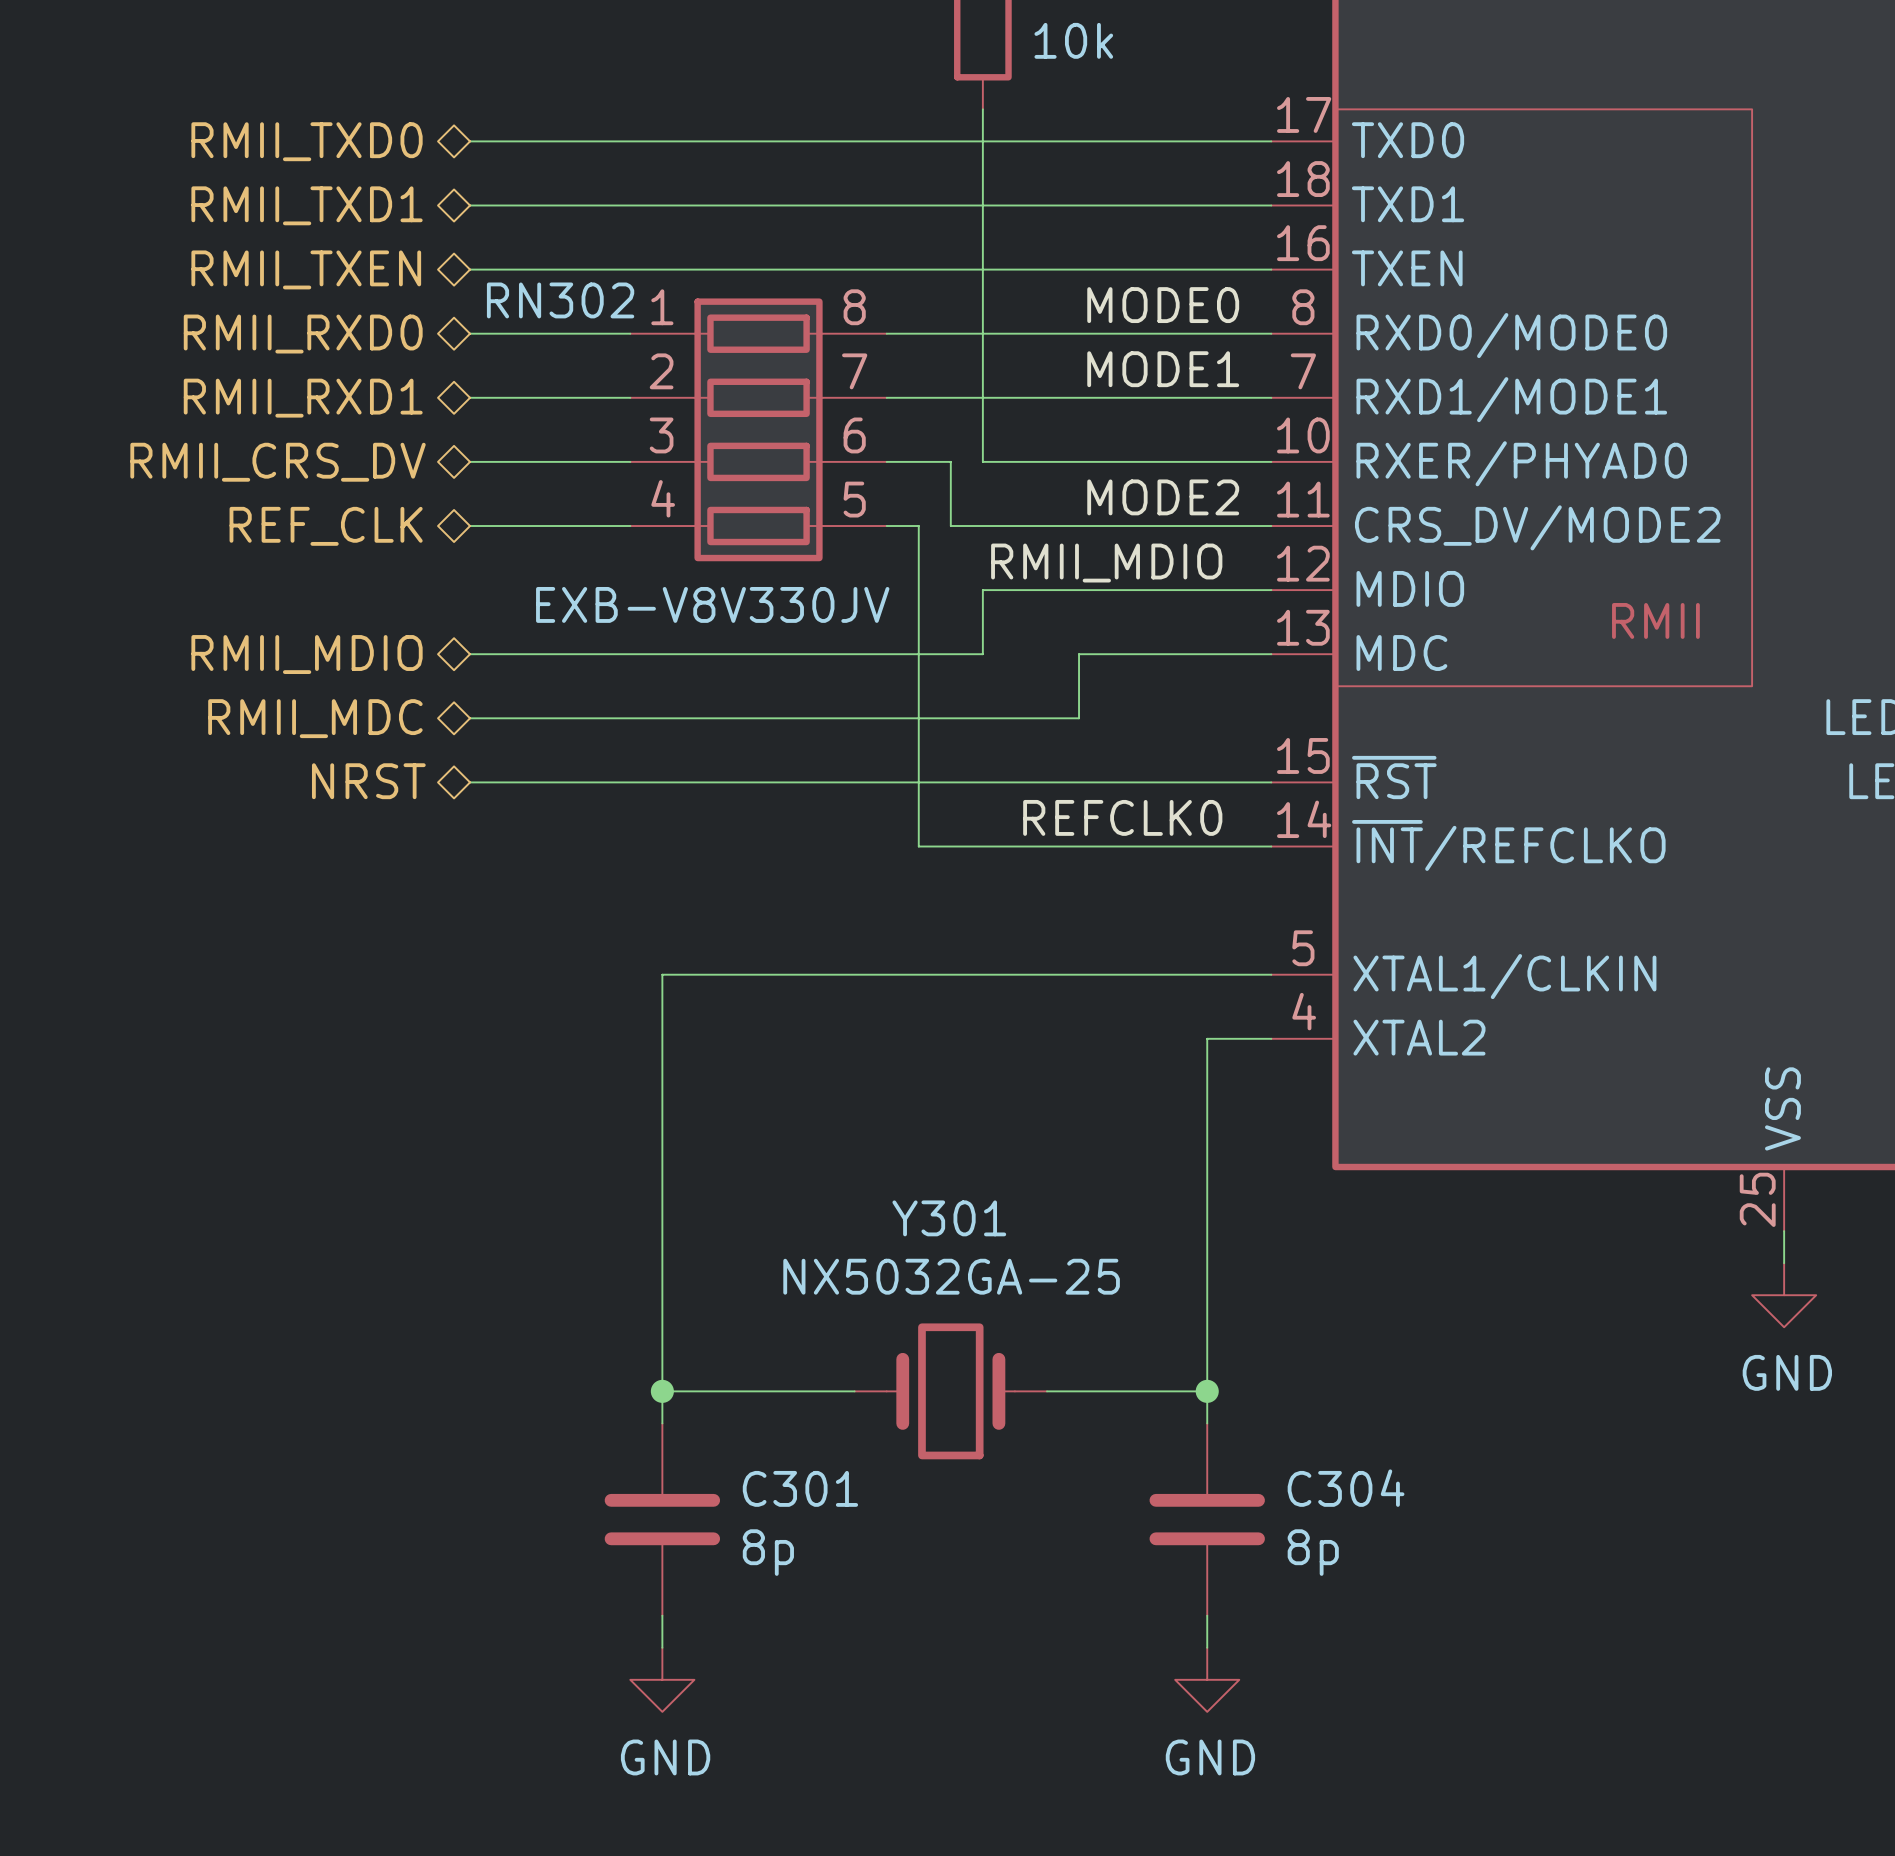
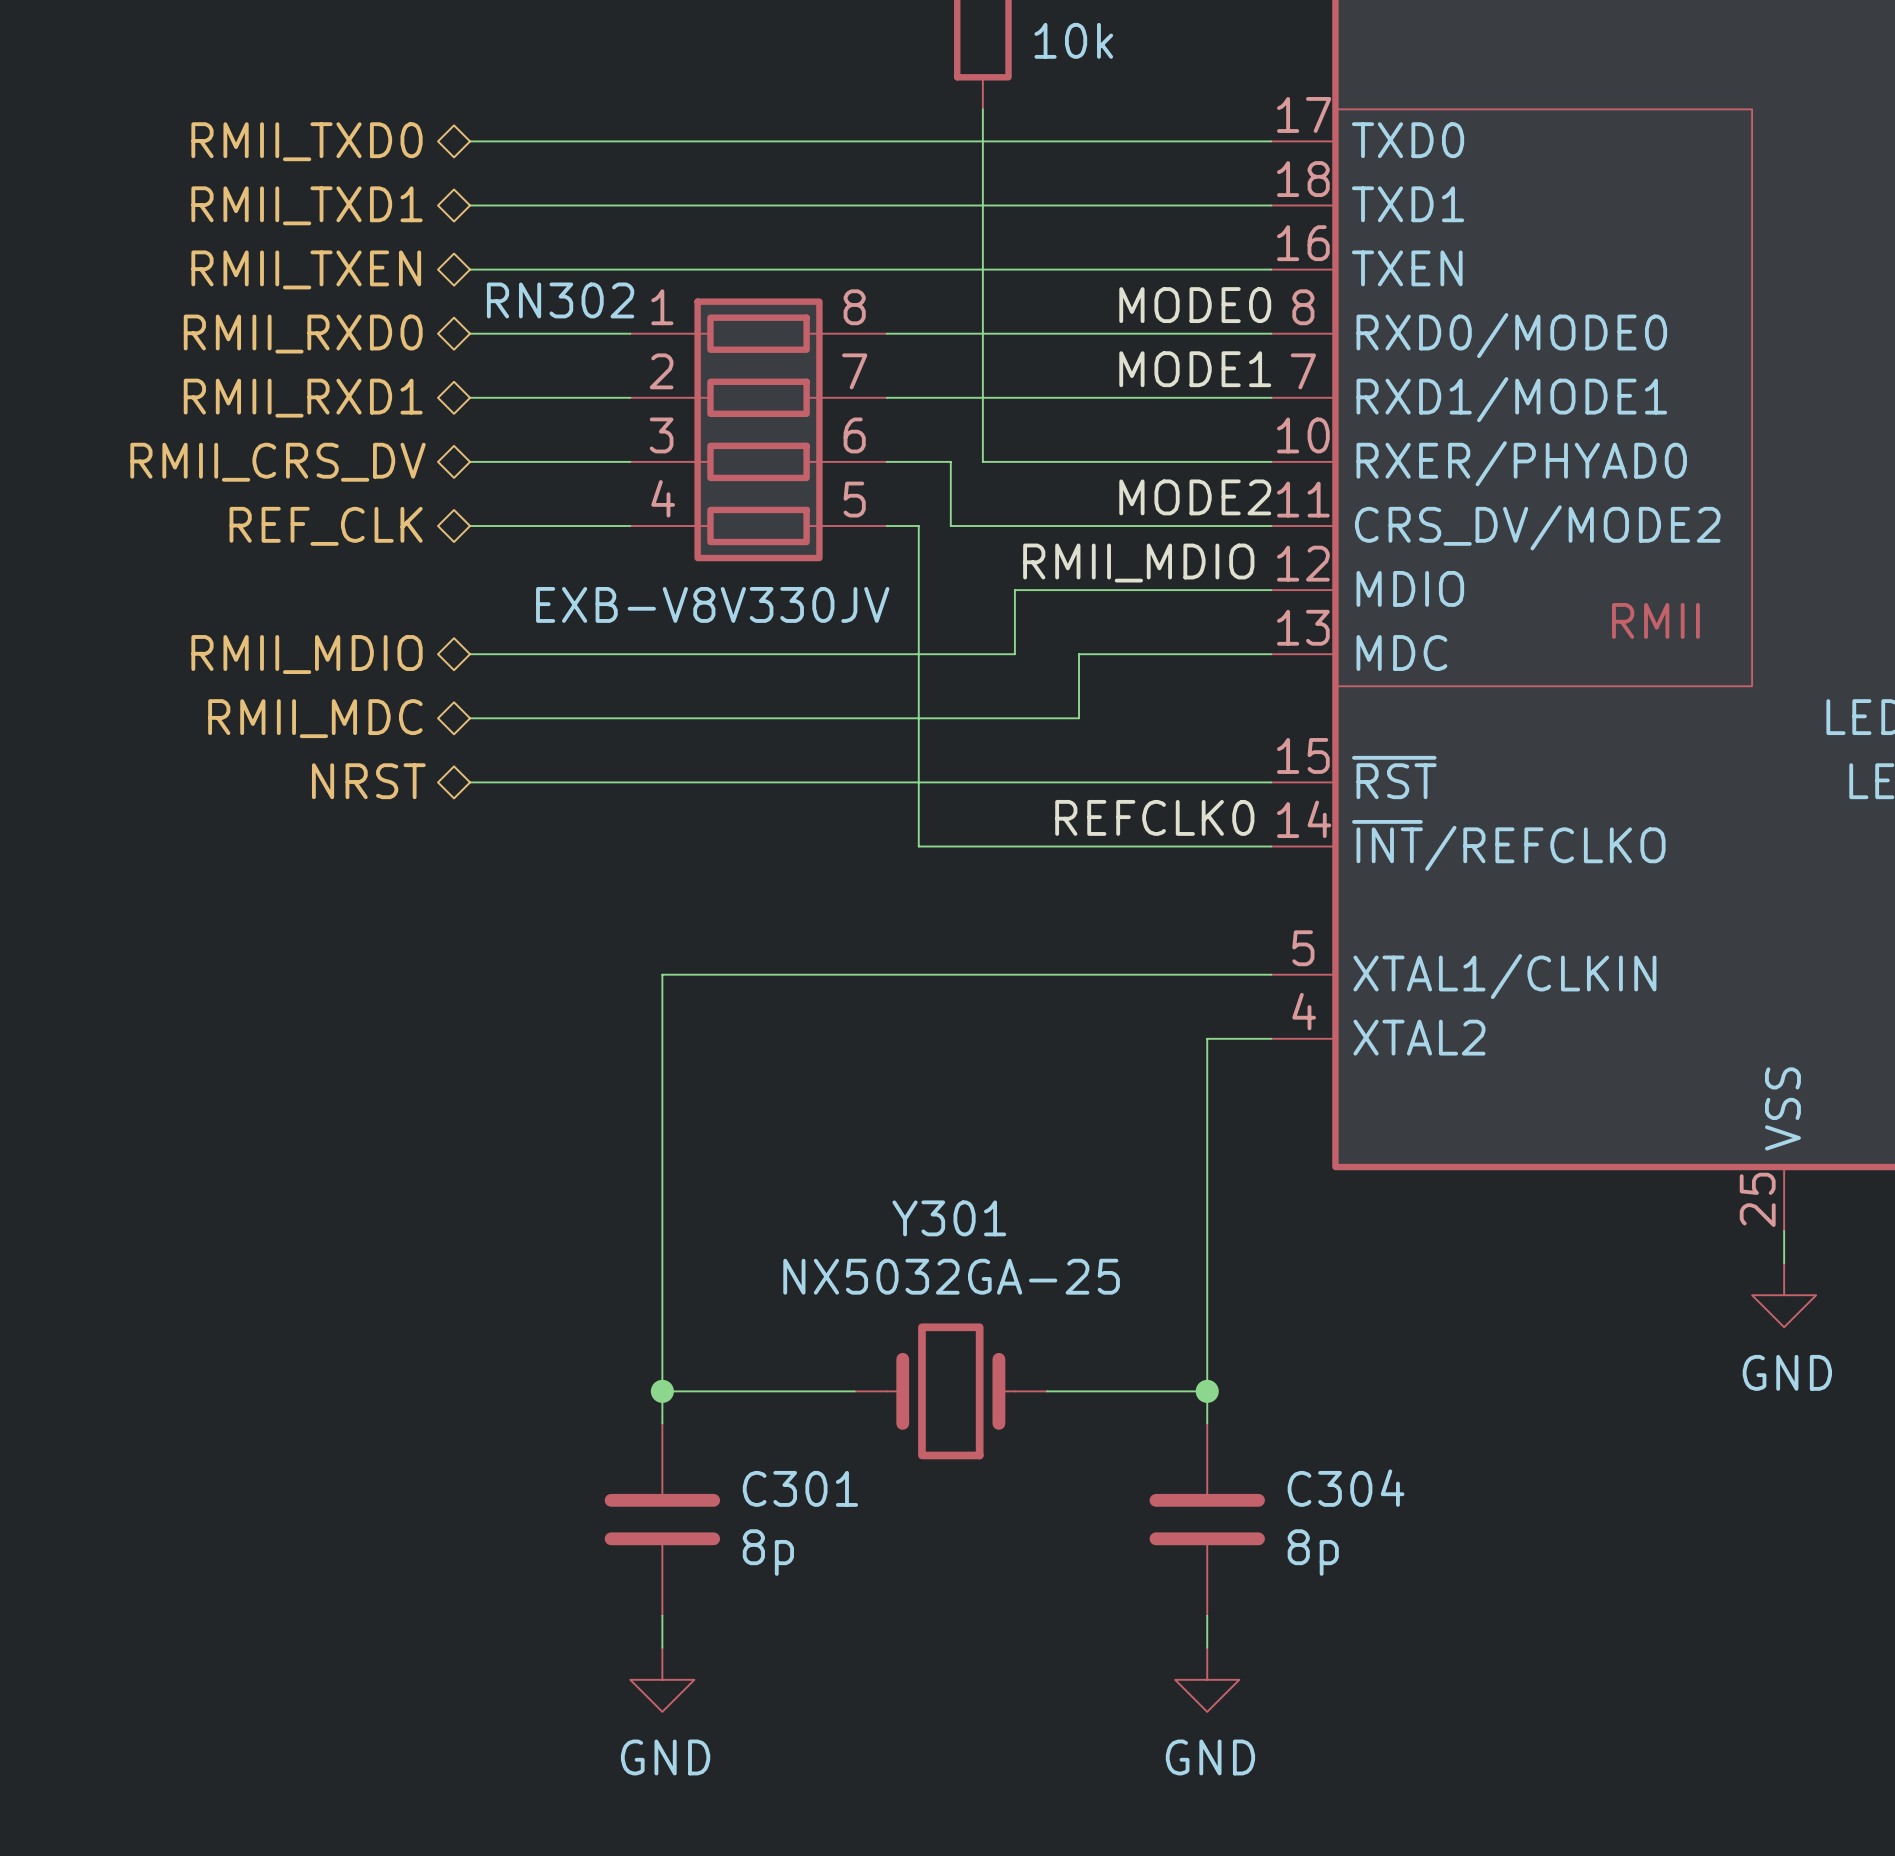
label position: MODE0 (1163, 305) -> MODE0 (1195, 305)
label position: MODE1 (1163, 369) -> MODE1 (1195, 369)
label position: MODE2 (1163, 497) -> MODE2 (1195, 497)
label position: RMII_MDIO (1106, 563) -> RMII_MDIO (1138, 563)
wire: (1014, 590) (982, 590) (982, 654) -> (1014, 590) (1014, 654) (982, 654)
label position: REFCLK0 (1122, 817) -> REFCLK0 (1154, 817)

